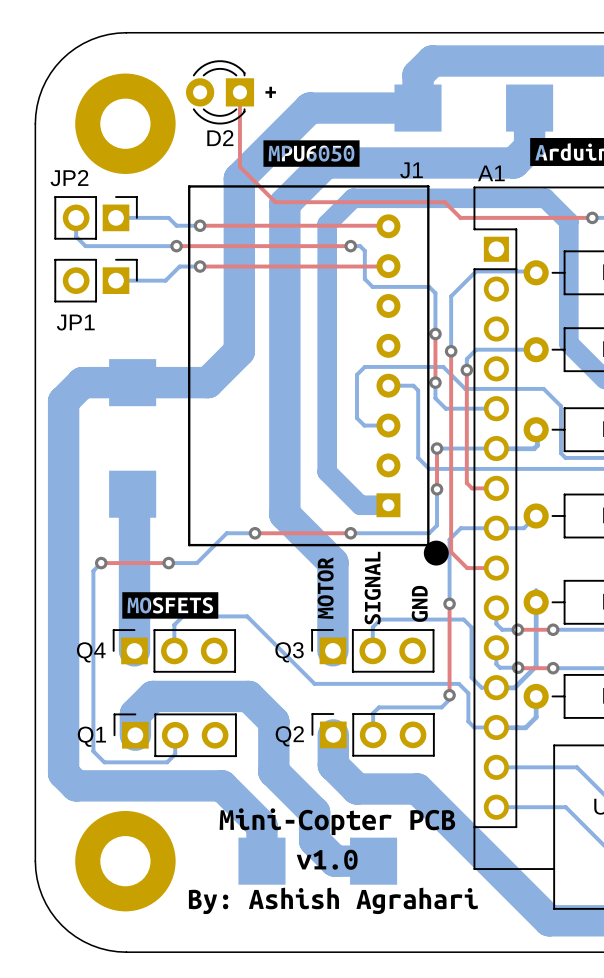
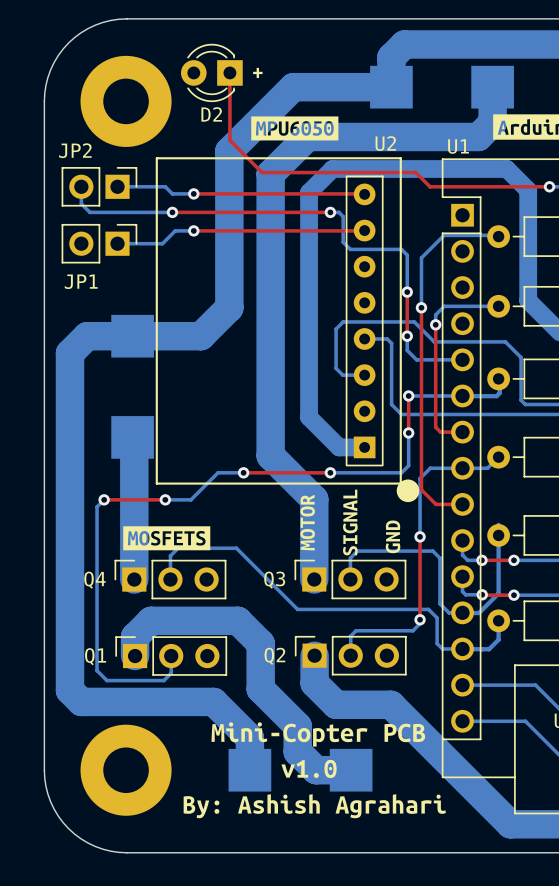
A1 name: A1 (491, 173) -> U1 (458, 146)
U2: none -> (287, 329)
J1: (318, 375) -> none

